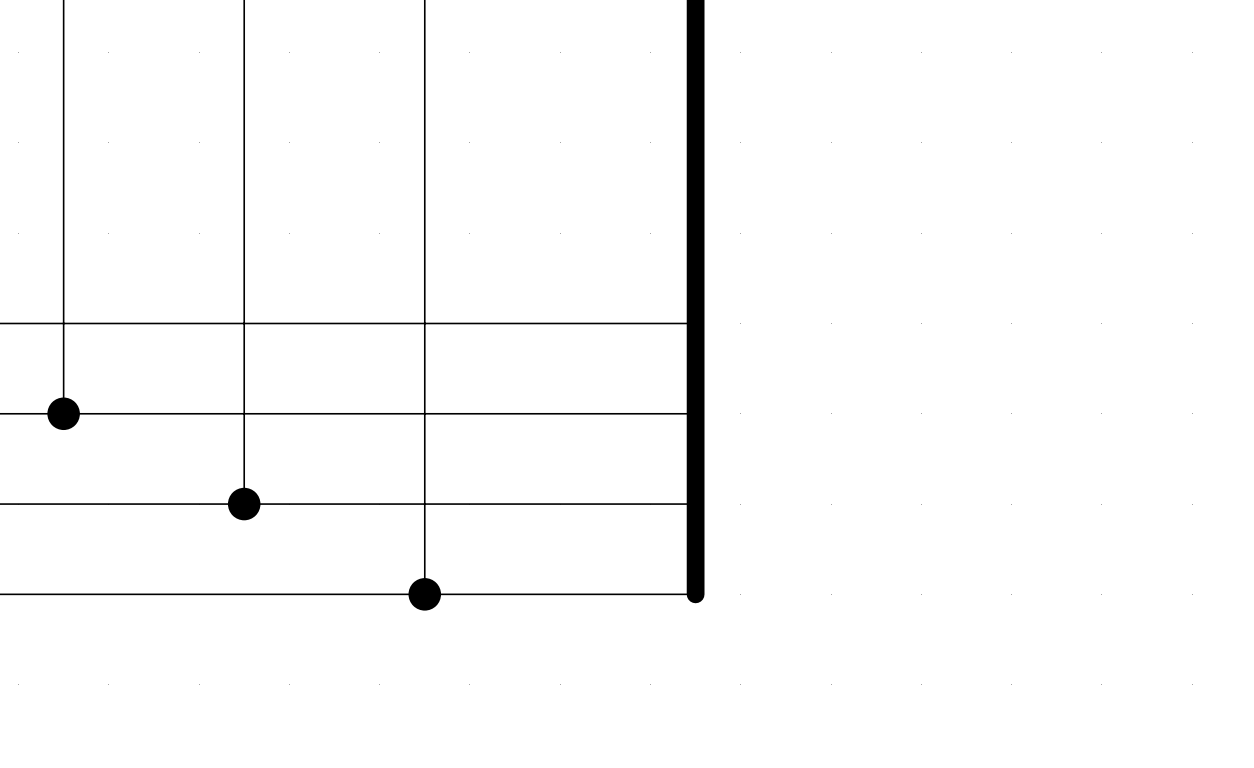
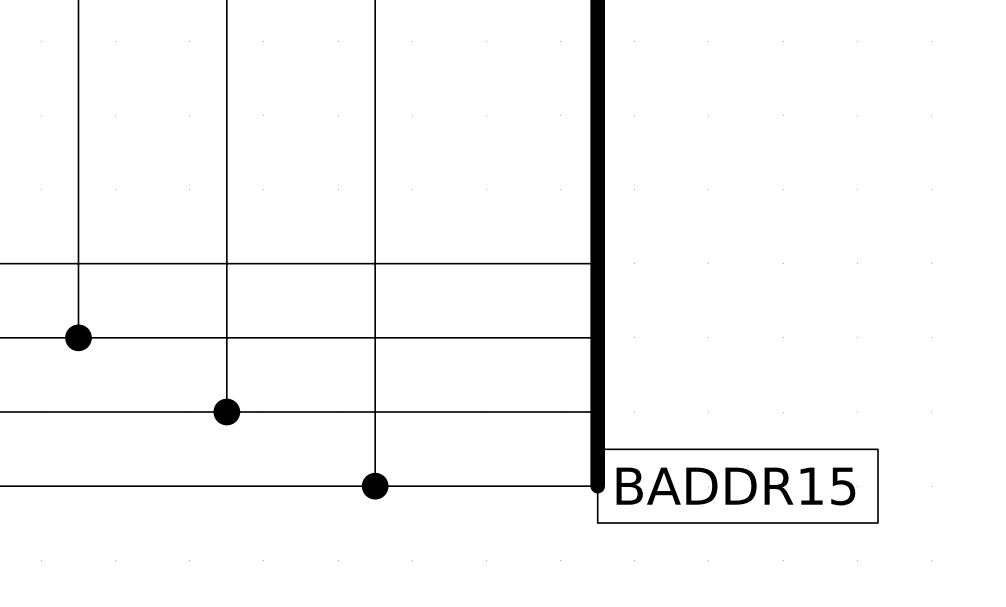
global label: none -> BADDR15 (735, 486)

